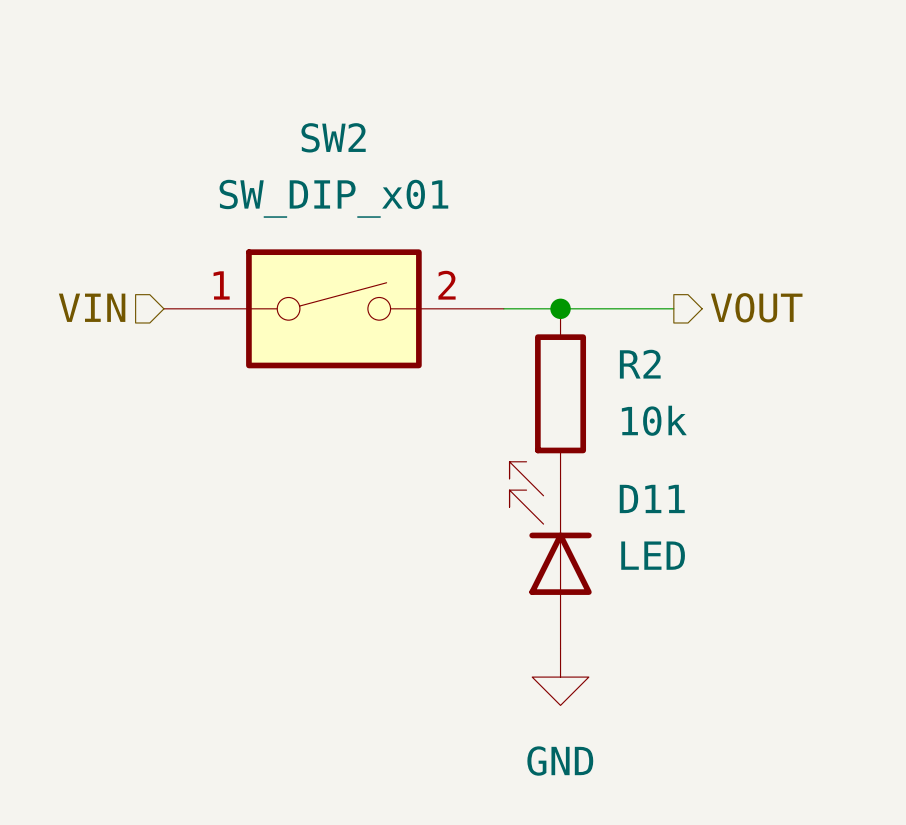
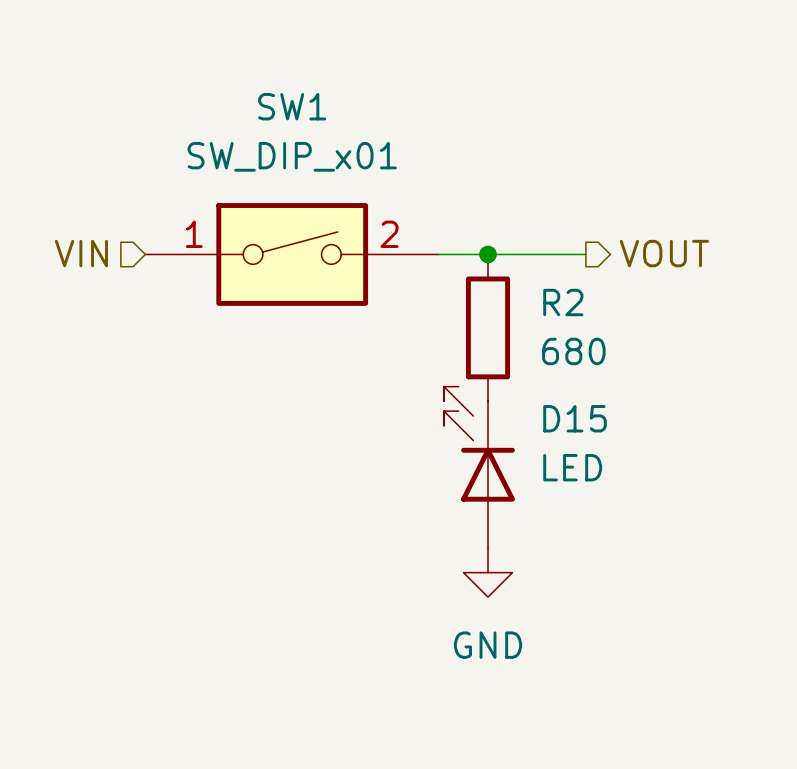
SW2 name: SW2 (333, 137) -> SW1 (292, 106)
R2 value: 10k (654, 420) -> 680 (573, 351)
D11 name: D11 (652, 498) -> D15 (575, 418)

